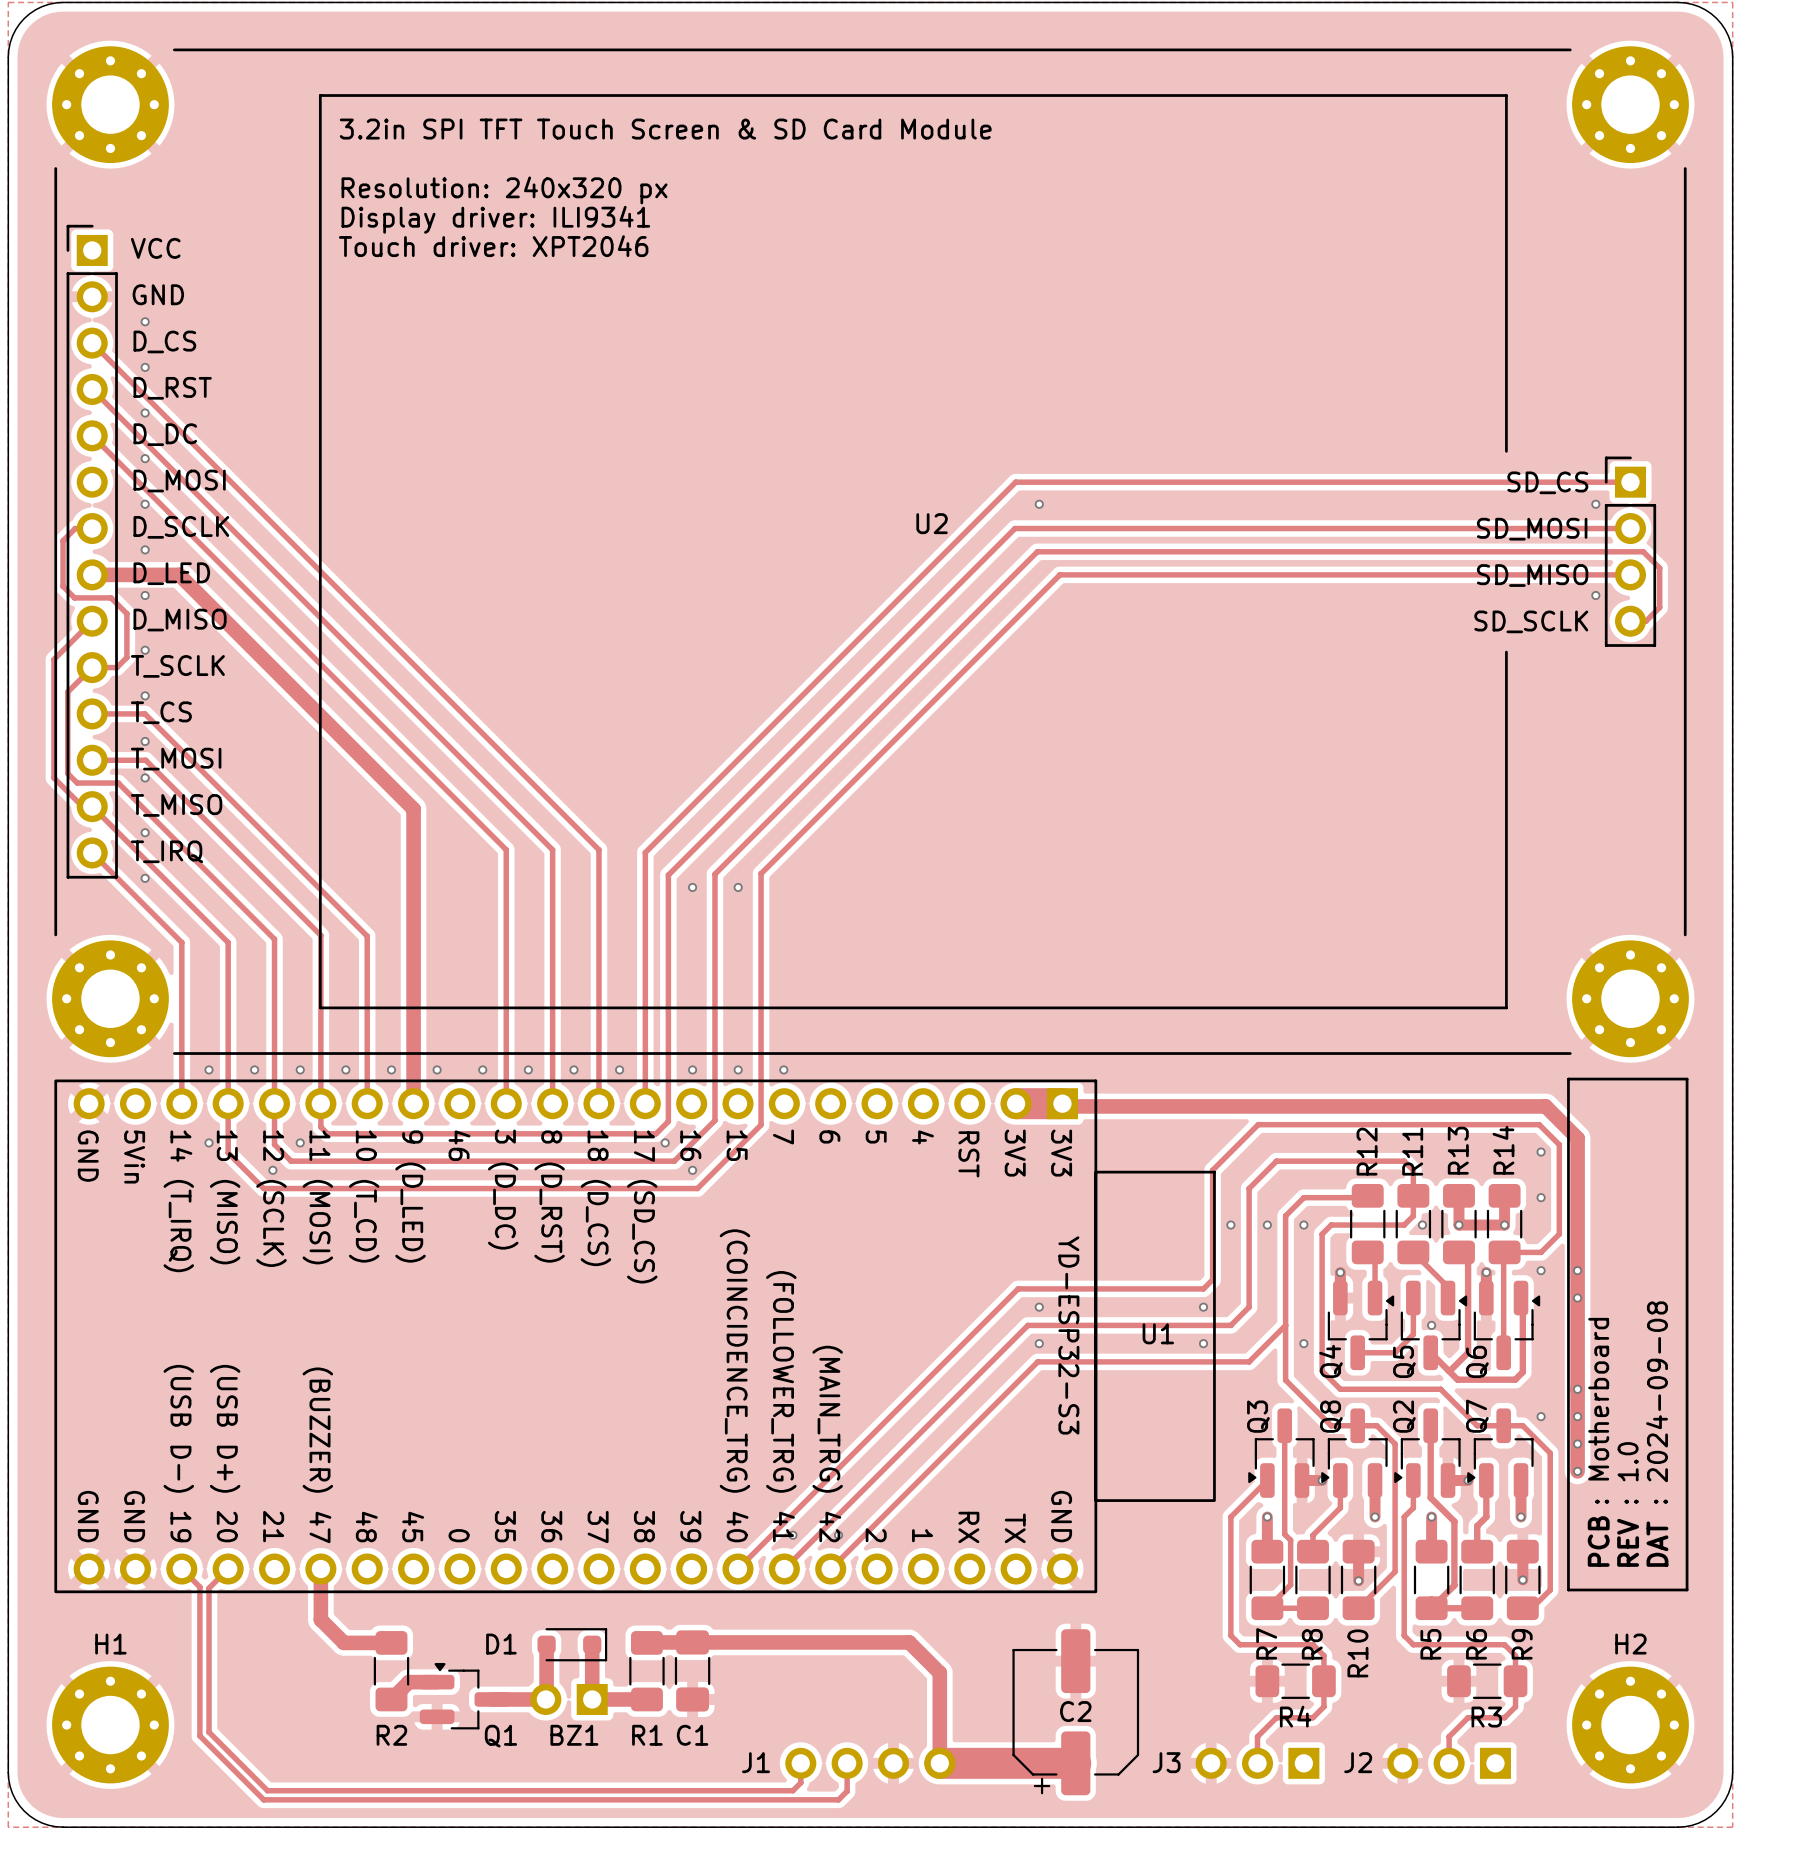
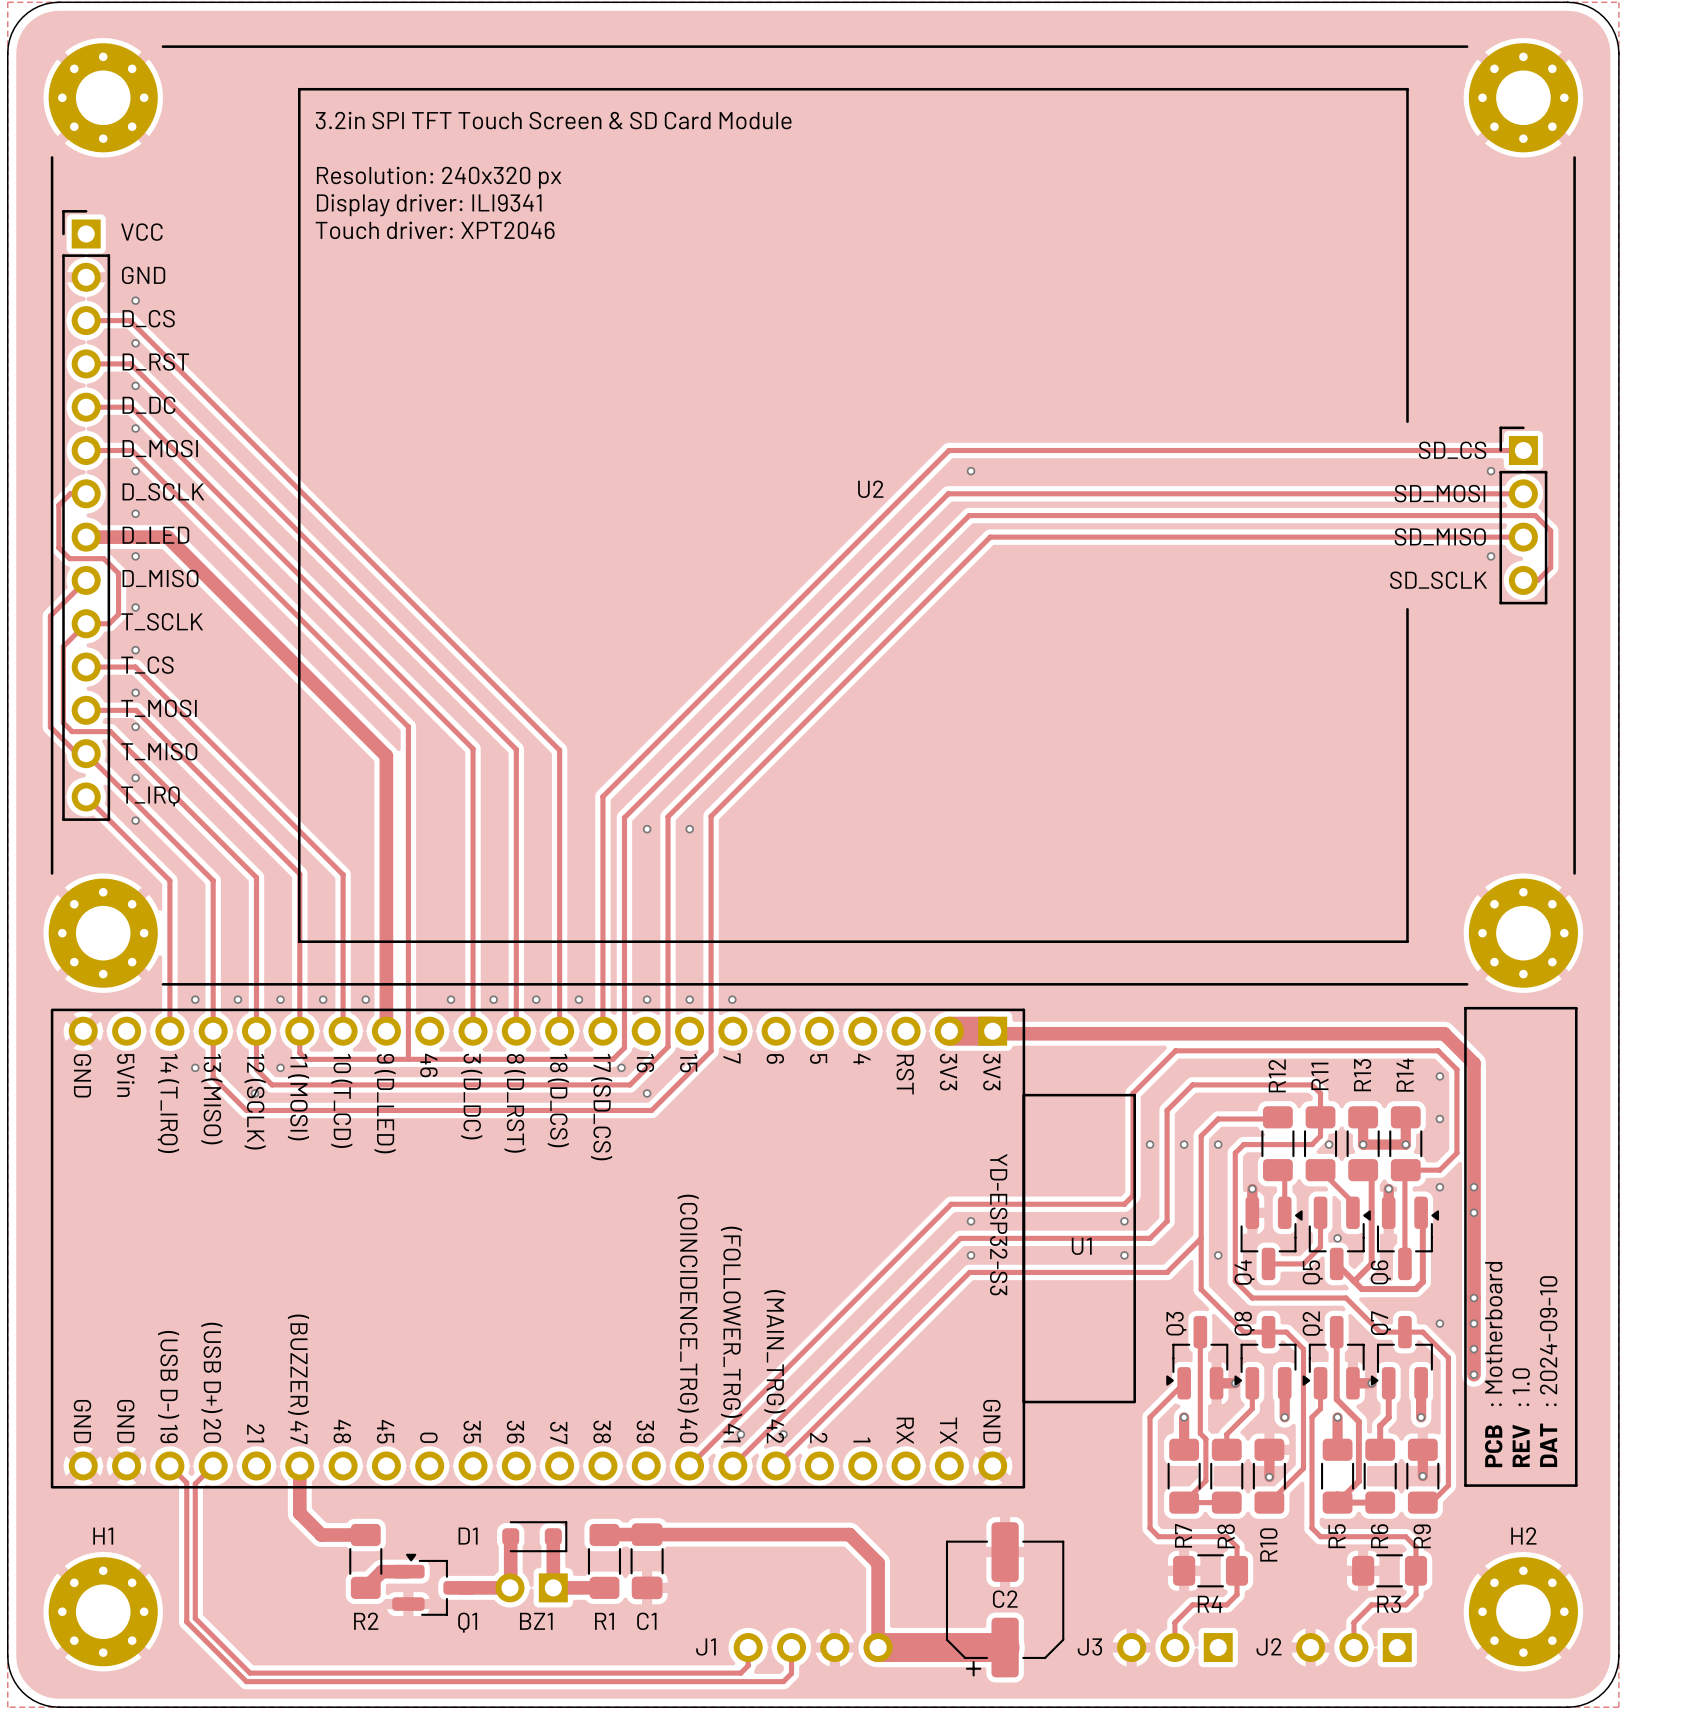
track: (92, 343) (598, 849) -> (86, 320) (129, 320) (559, 750) (559, 794)
track: (92, 389) (552, 849) -> (86, 363) (130, 363) (516, 749) (516, 794)
track: (92, 435) (506, 849) -> (86, 407) (131, 407) (473, 748) (473, 794)
track: none -> (86, 450) (132, 450) (408, 726) (408, 1059)
via: (437, 1069) -> none
text: : 2024-09-08 (1657, 1402) -> : 2024-09-10 (1548, 1341)

